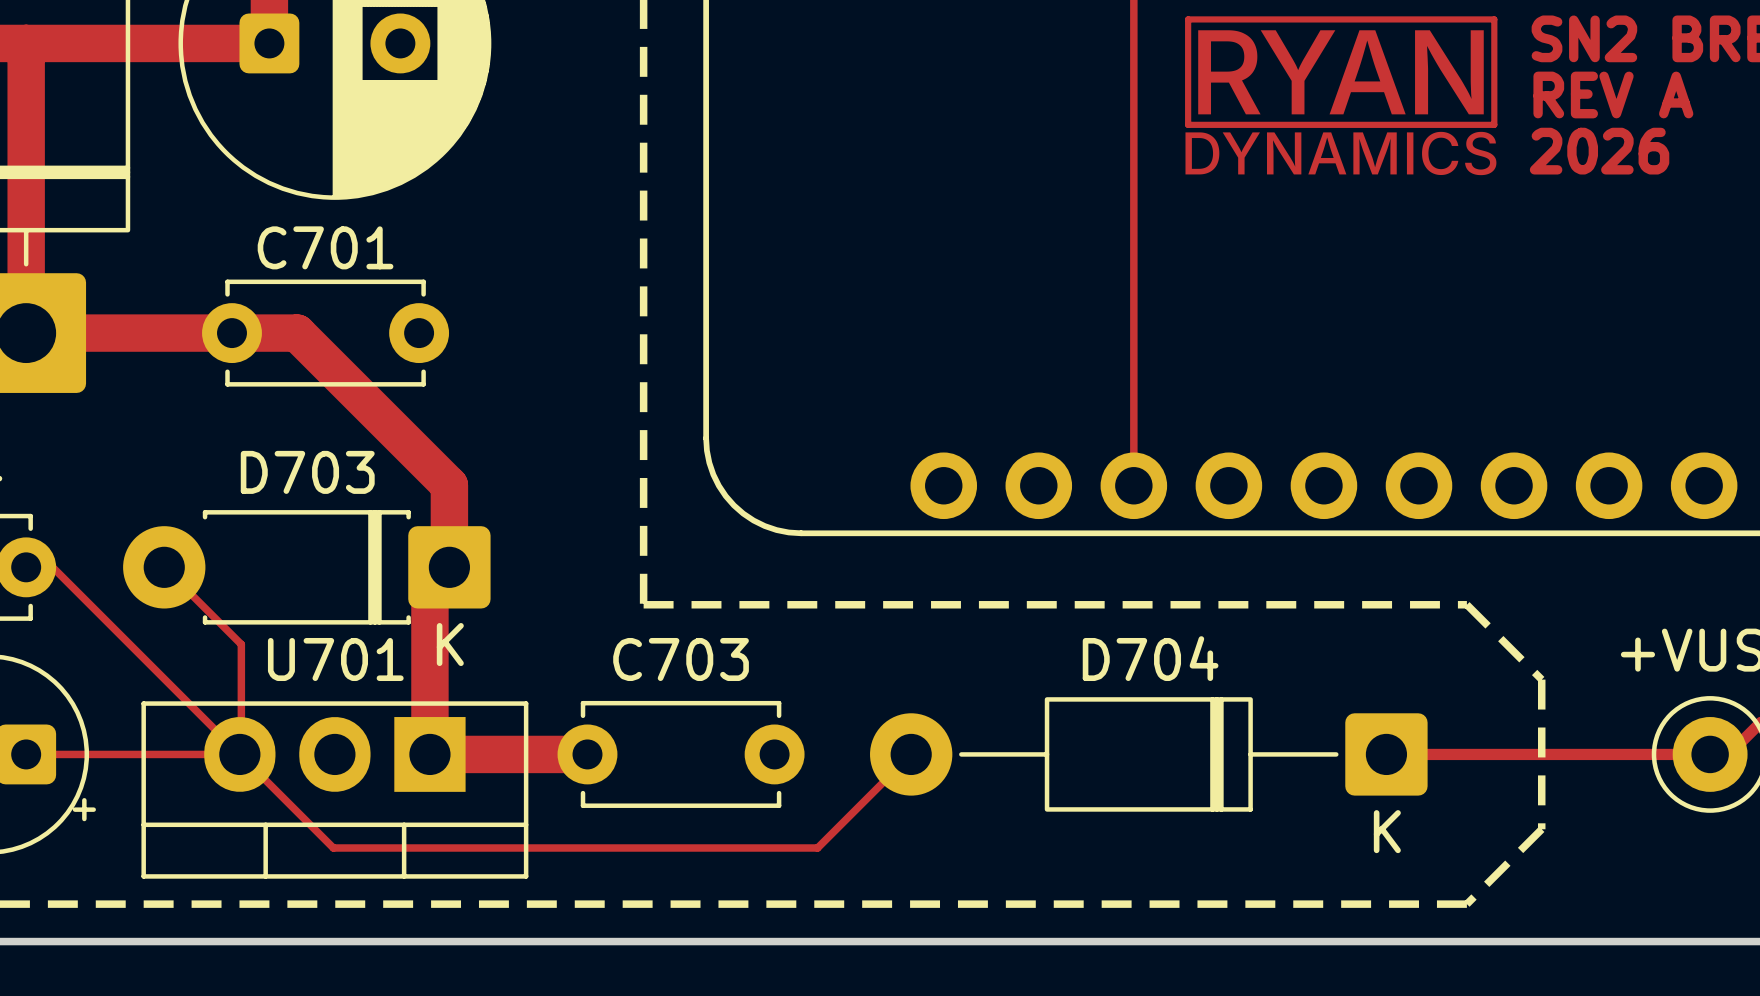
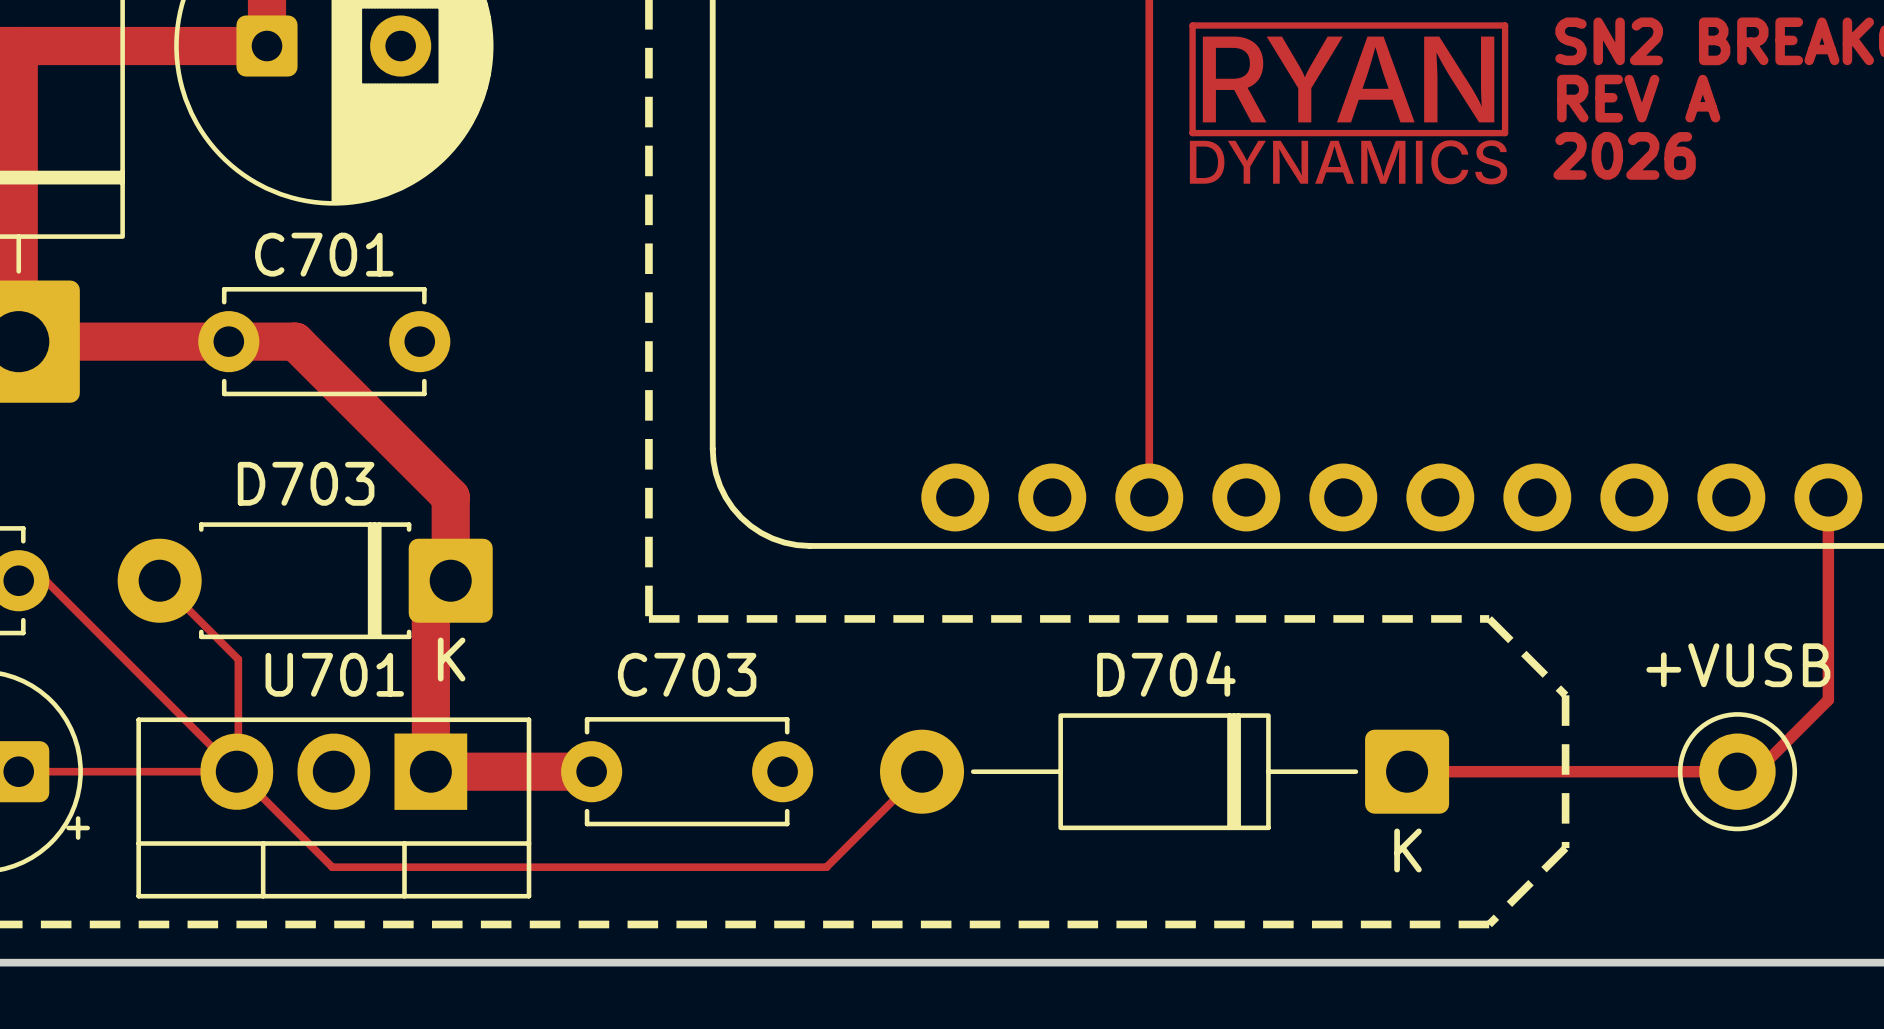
track: (1188, 19) (1188, 124) (1494, 124) (1494, 19) (1188, 19) -> (1192, 25) (1192, 133) (1505, 133) (1505, 25) (1192, 25)
drawing position: (1229, 72) -> (1234, 79)
drawing position: (1298, 72) -> (1304, 79)
drawing position: (1367, 72) -> (1375, 79)
drawing position: (1449, 72) -> (1459, 79)
drawing position: (1202, 153) -> (1207, 162)
drawing position: (1241, 153) -> (1246, 162)
drawing position: (1284, 153) -> (1290, 162)
drawing position: (1327, 153) -> (1334, 162)
drawing position: (1375, 153) -> (1383, 162)
drawing position: (1410, 153) -> (1419, 162)
drawing position: (1440, 153) -> (1449, 162)
drawing position: (1480, 153) -> (1491, 162)

